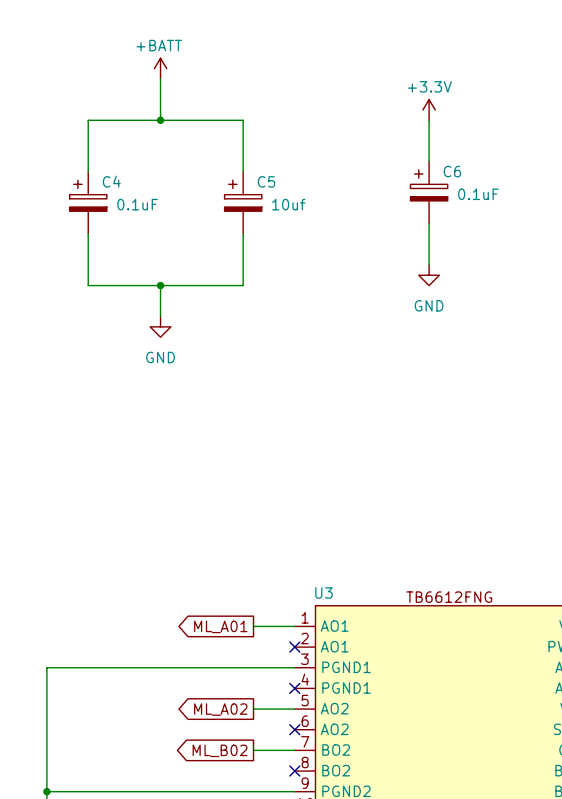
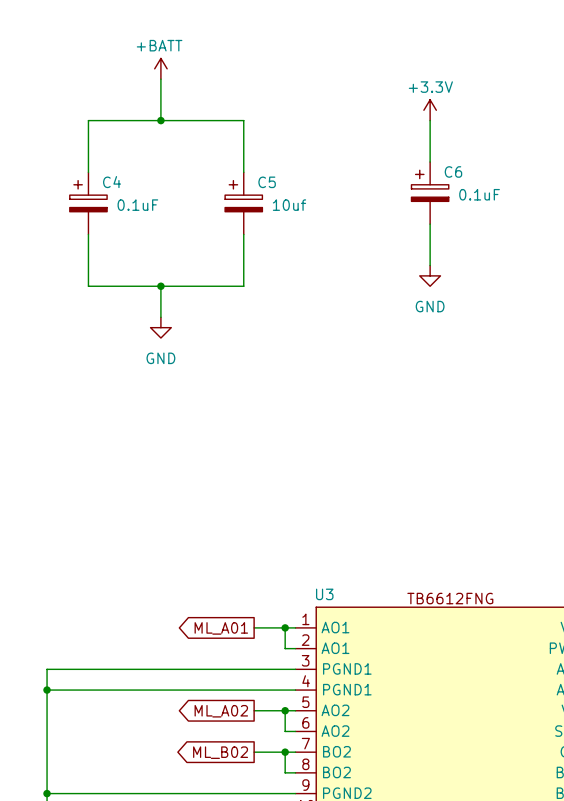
wire: none -> (285, 627) (285, 648) (295, 648)
junction: none -> (285, 627)
no-connect mark: (294, 647) -> none
wire: none -> (47, 690) (295, 690)
junction: none -> (47, 690)
no-connect mark: (294, 688) -> none
wire: none -> (285, 710) (285, 731) (295, 731)
junction: none -> (285, 710)
no-connect mark: (294, 729) -> none
wire: none -> (285, 752) (285, 772) (295, 772)
junction: none -> (285, 752)
no-connect mark: (294, 771) -> none

